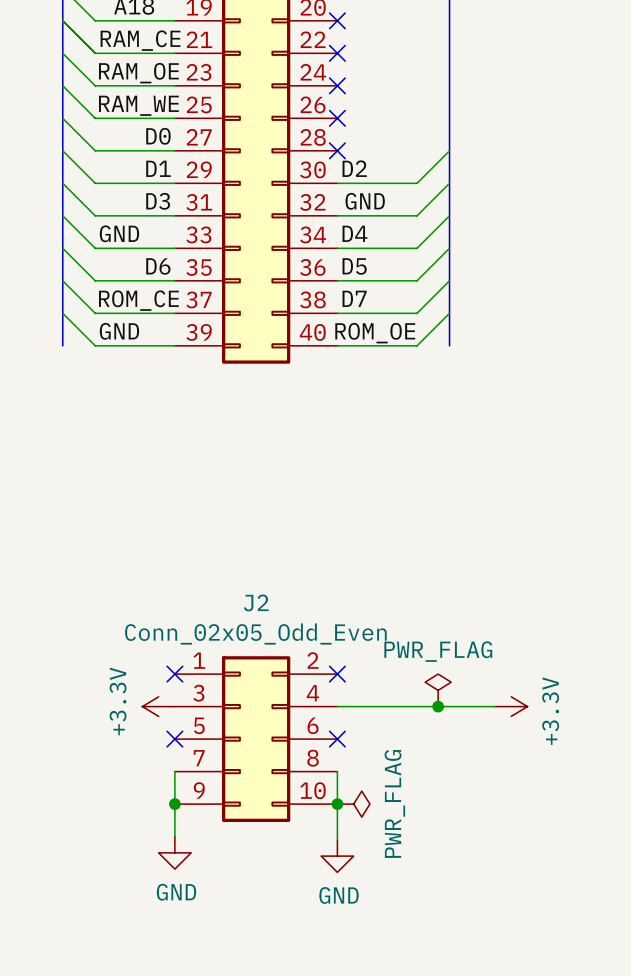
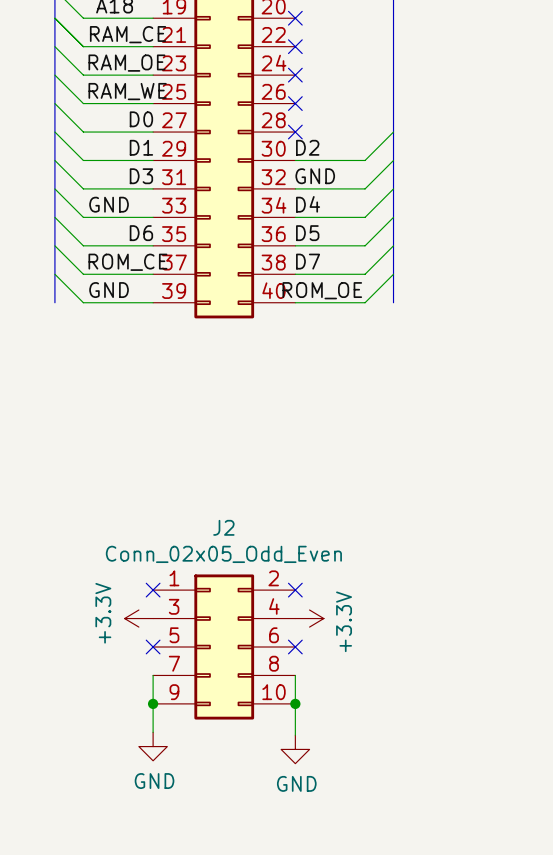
power symbol: PWR_FLAG (438, 690) -> none
wire: (337, 706) (495, 706) -> none
junction: (438, 706) -> none
power symbol position: +3.3V (511, 706) -> +3.3V (309, 618)
power symbol: PWR_FLAG (353, 804) -> none

